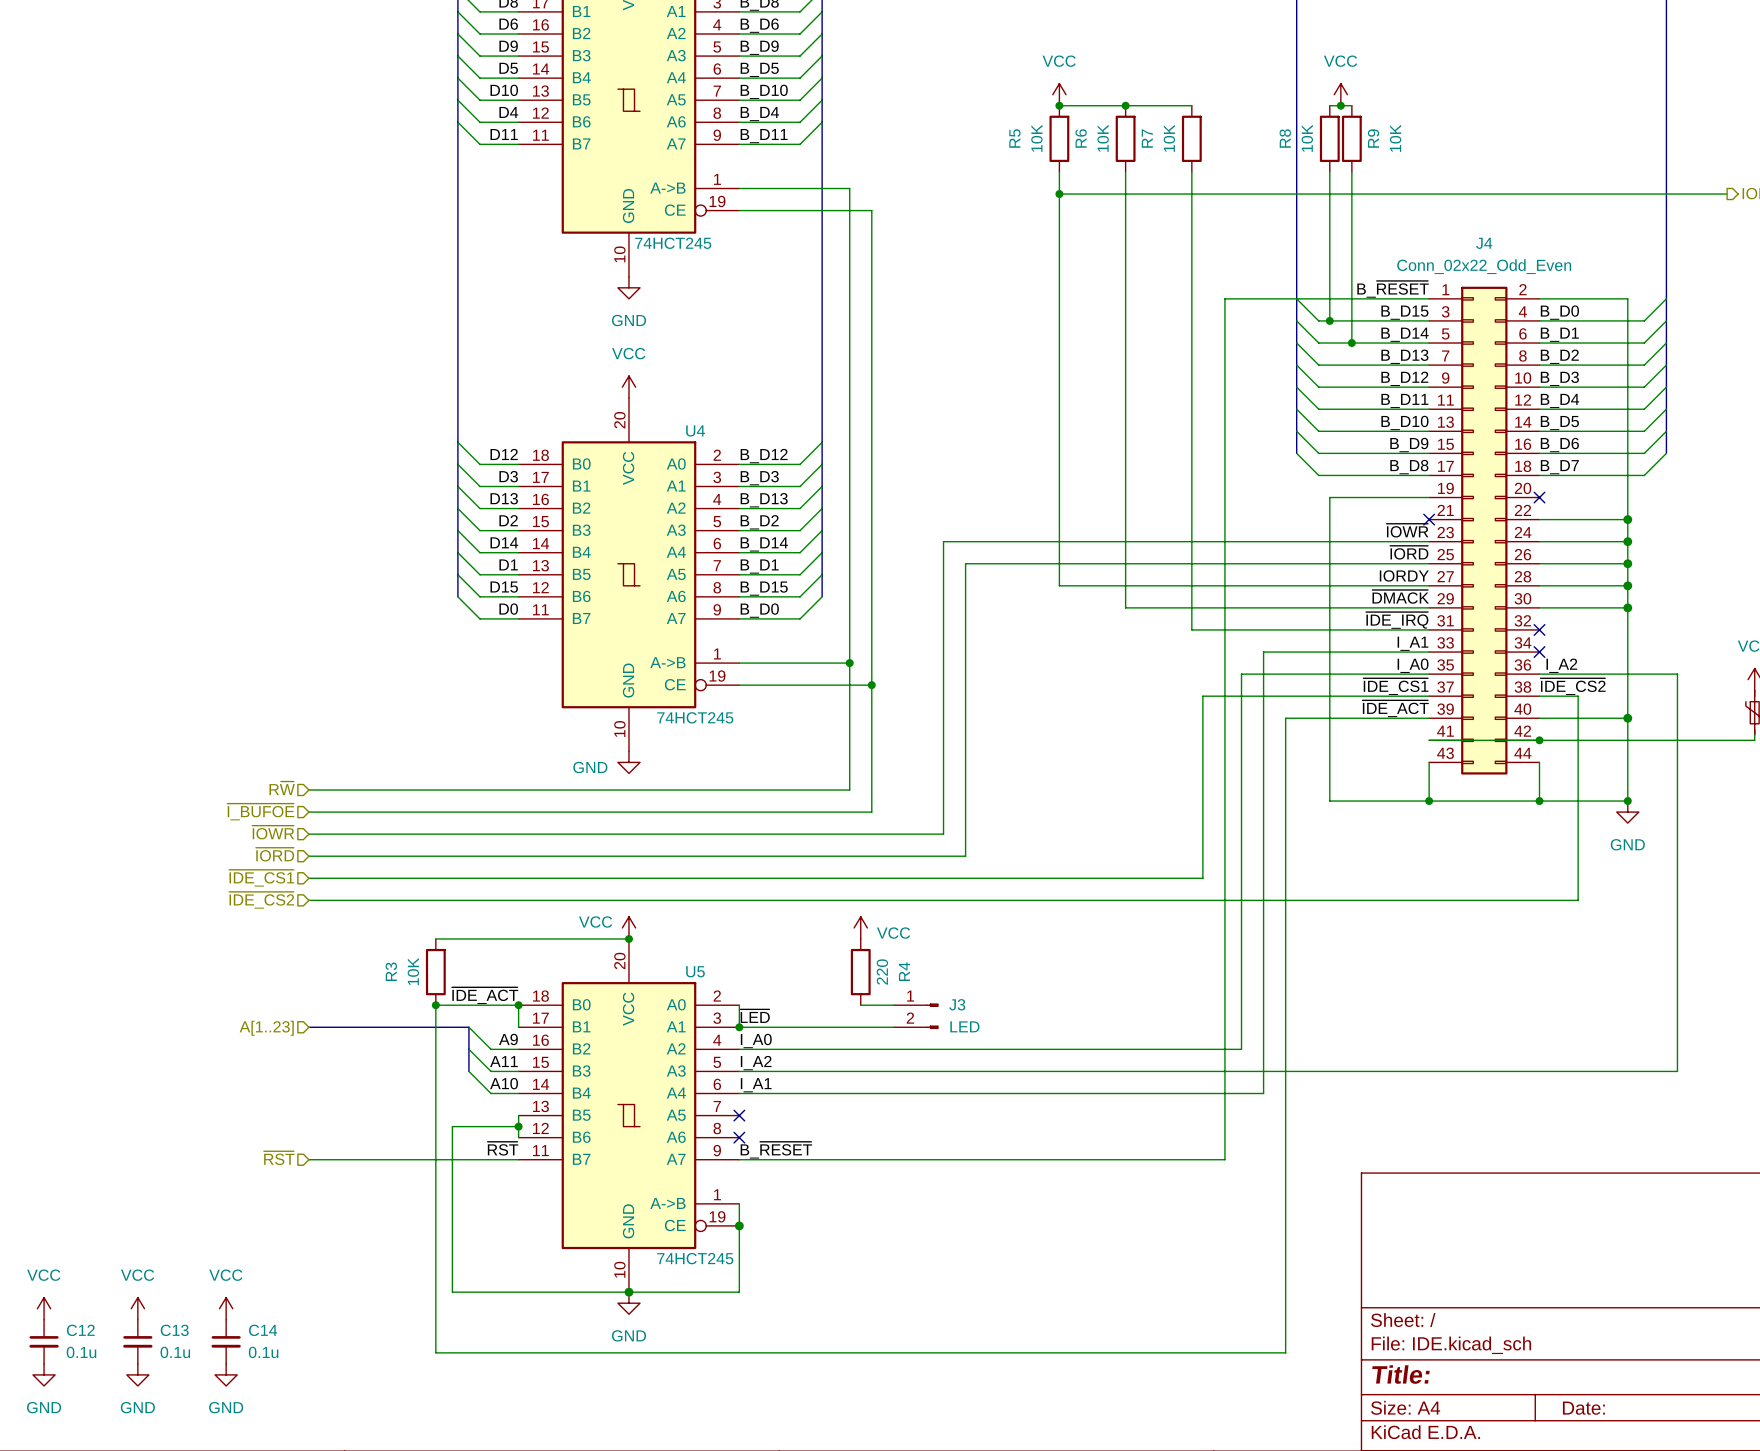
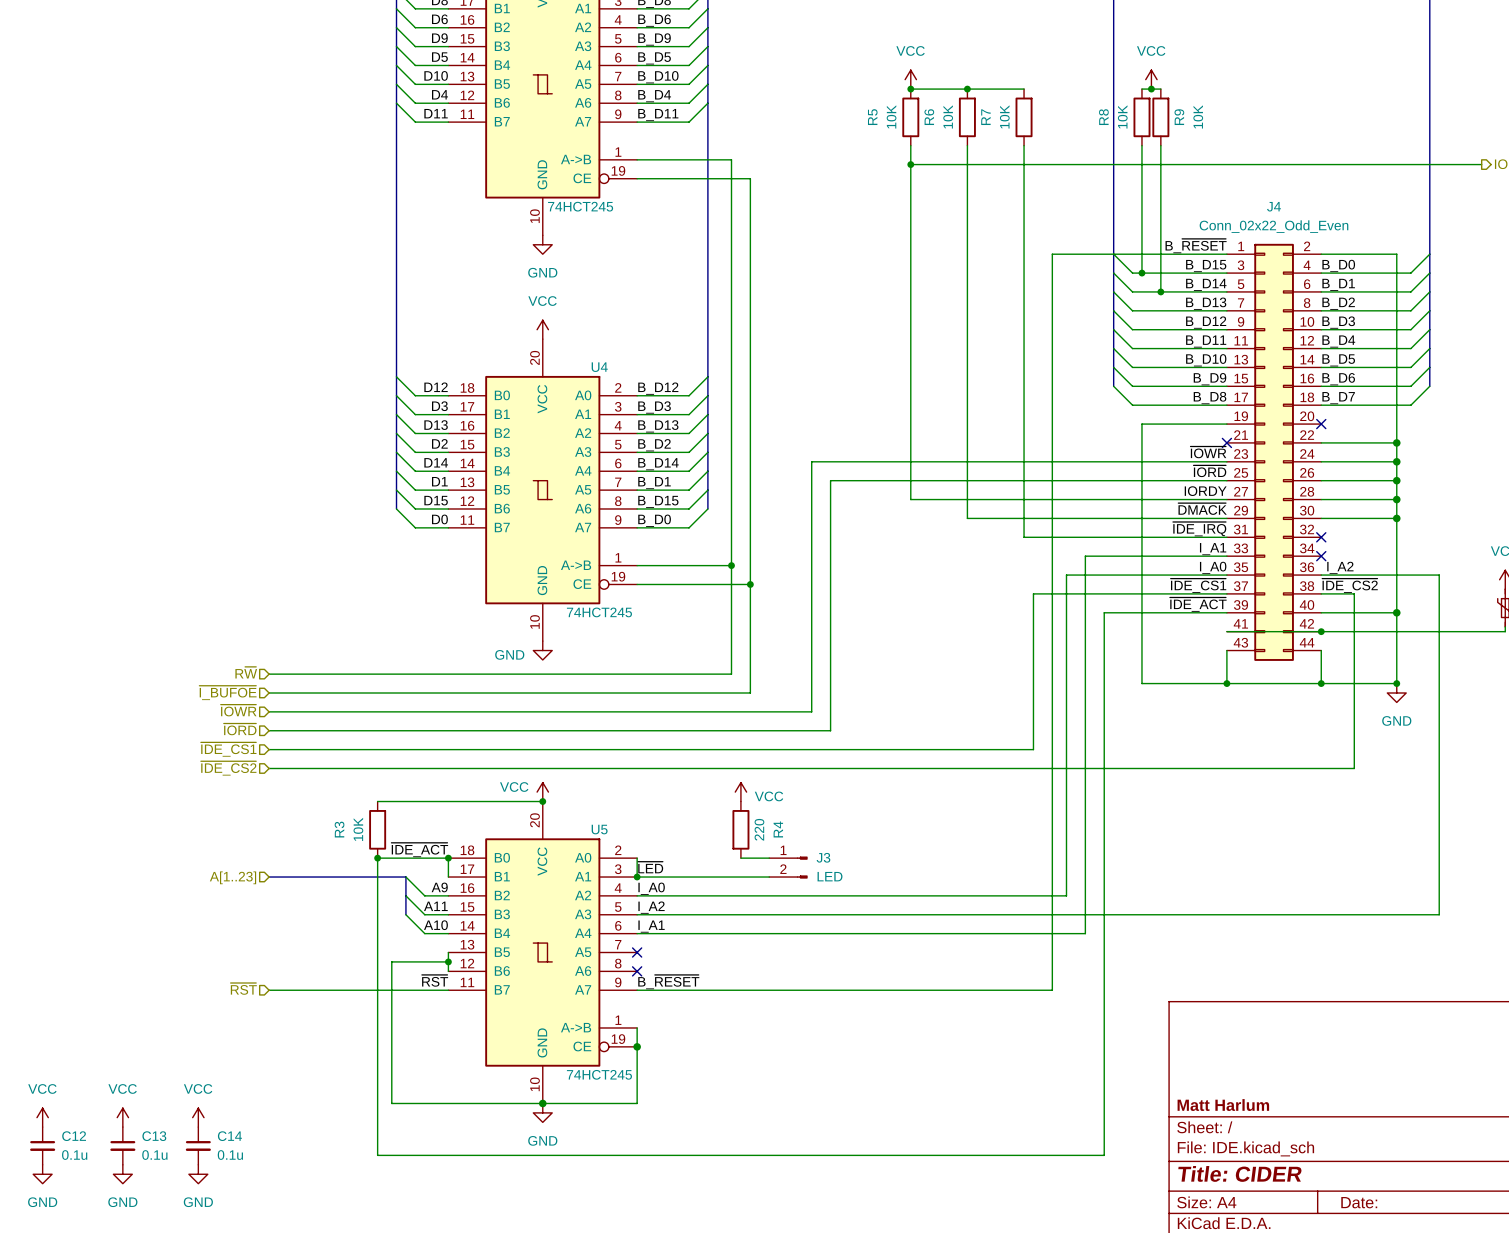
title block: none -> Matt Harlum (1223, 1105)
title block: Title: (1400, 1374) -> Title: CIDER (1239, 1173)

